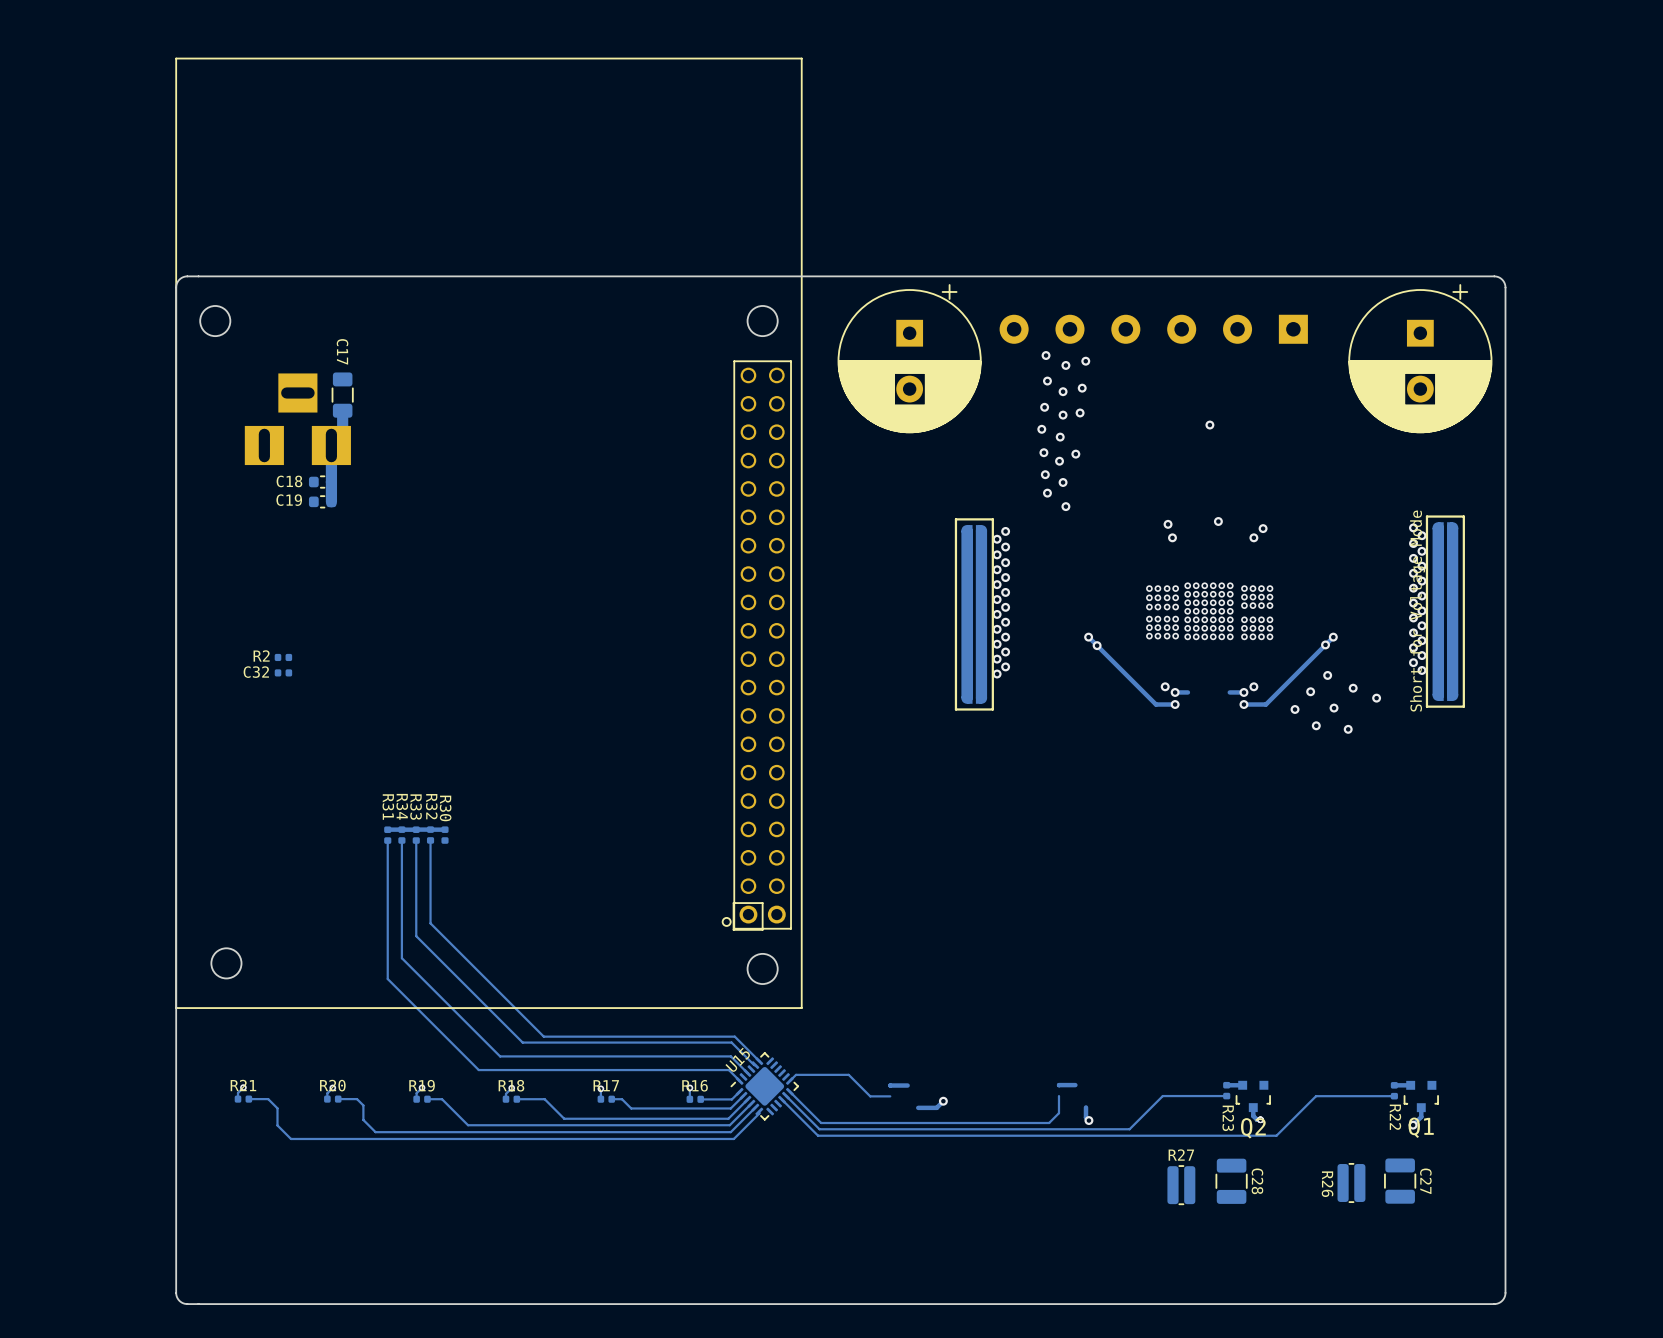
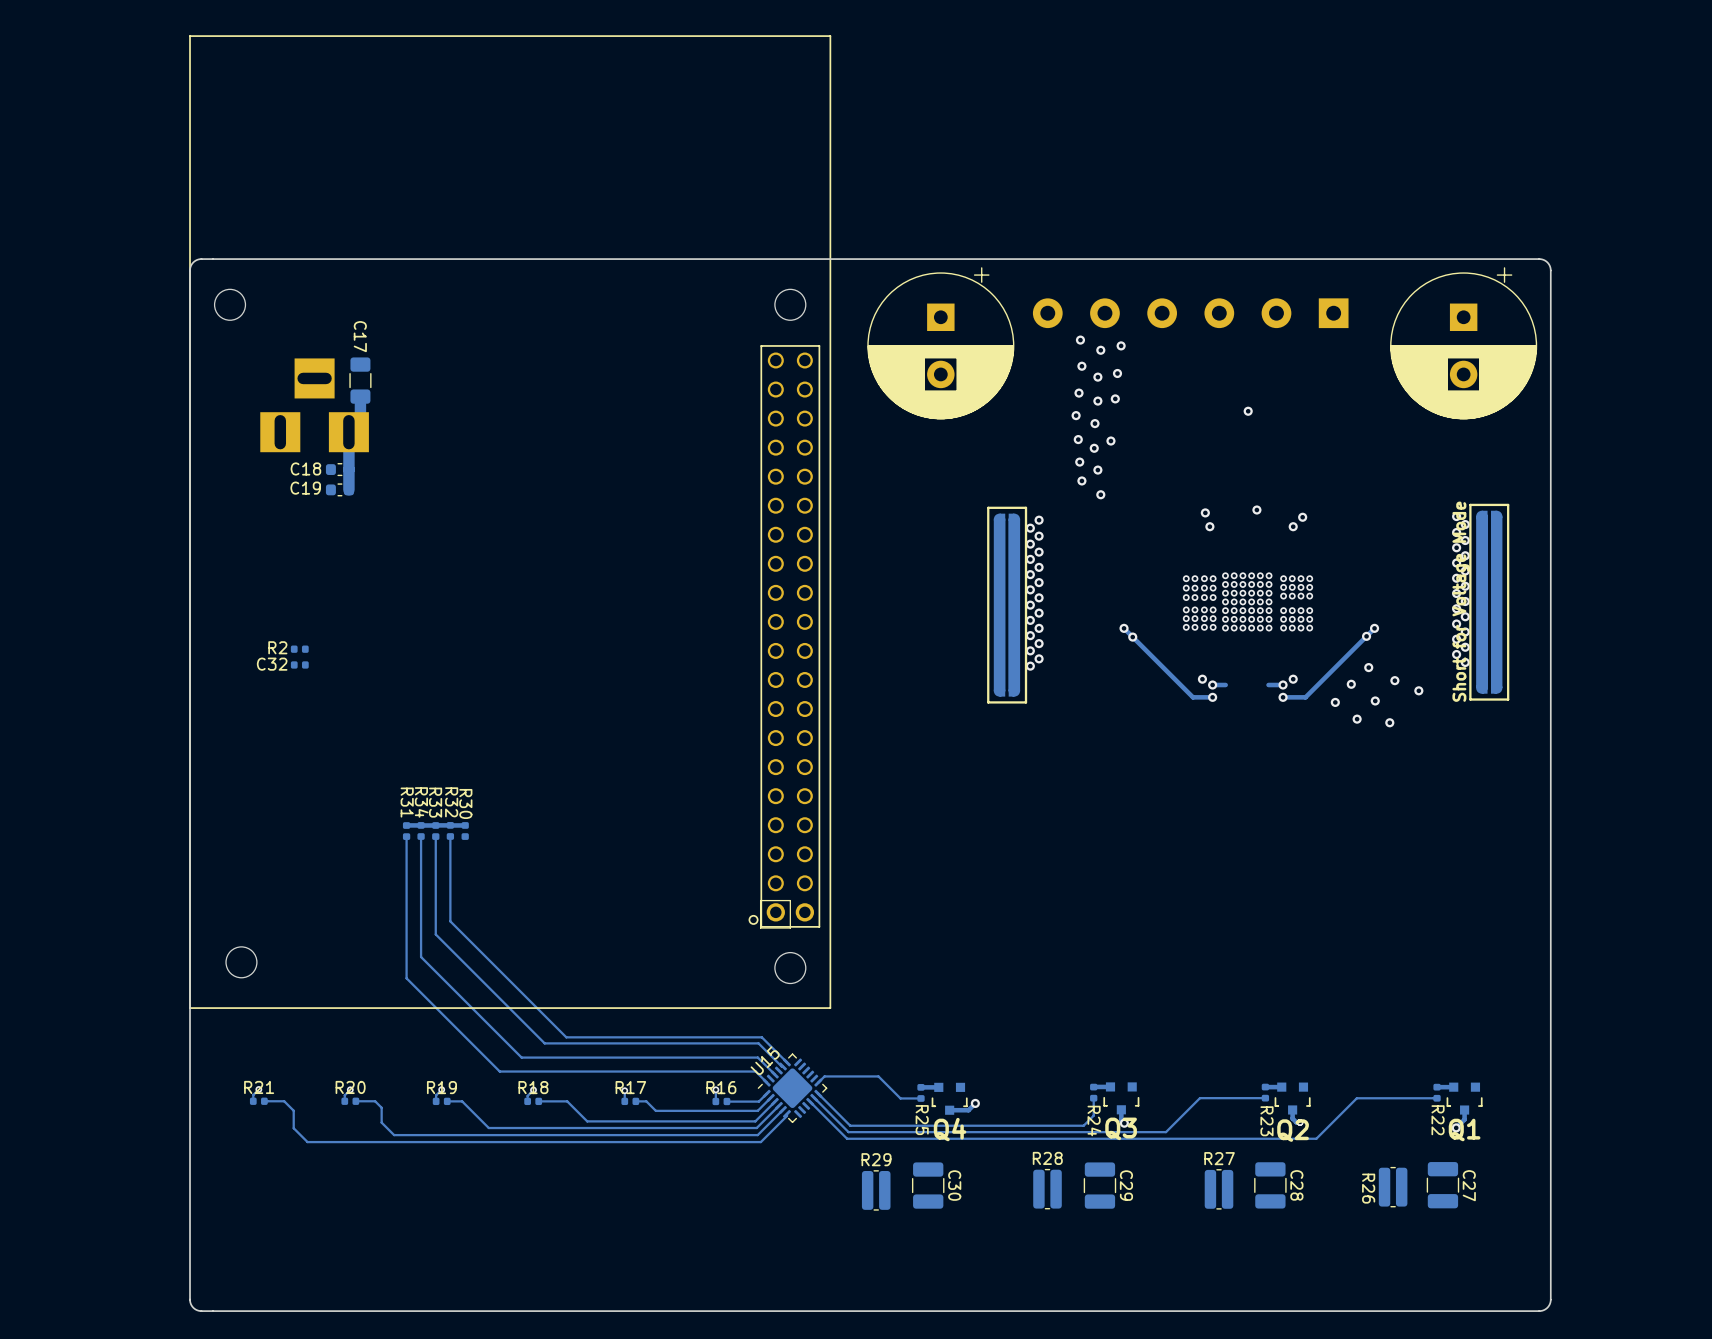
R25: none -> (921, 1092)
R24: none -> (1093, 1092)
Q4: none -> (949, 1098)
Q3: none -> (1121, 1098)
C30: none -> (928, 1185)
C29: none -> (1099, 1185)
R28: none -> (1047, 1189)
R29: none -> (876, 1190)

